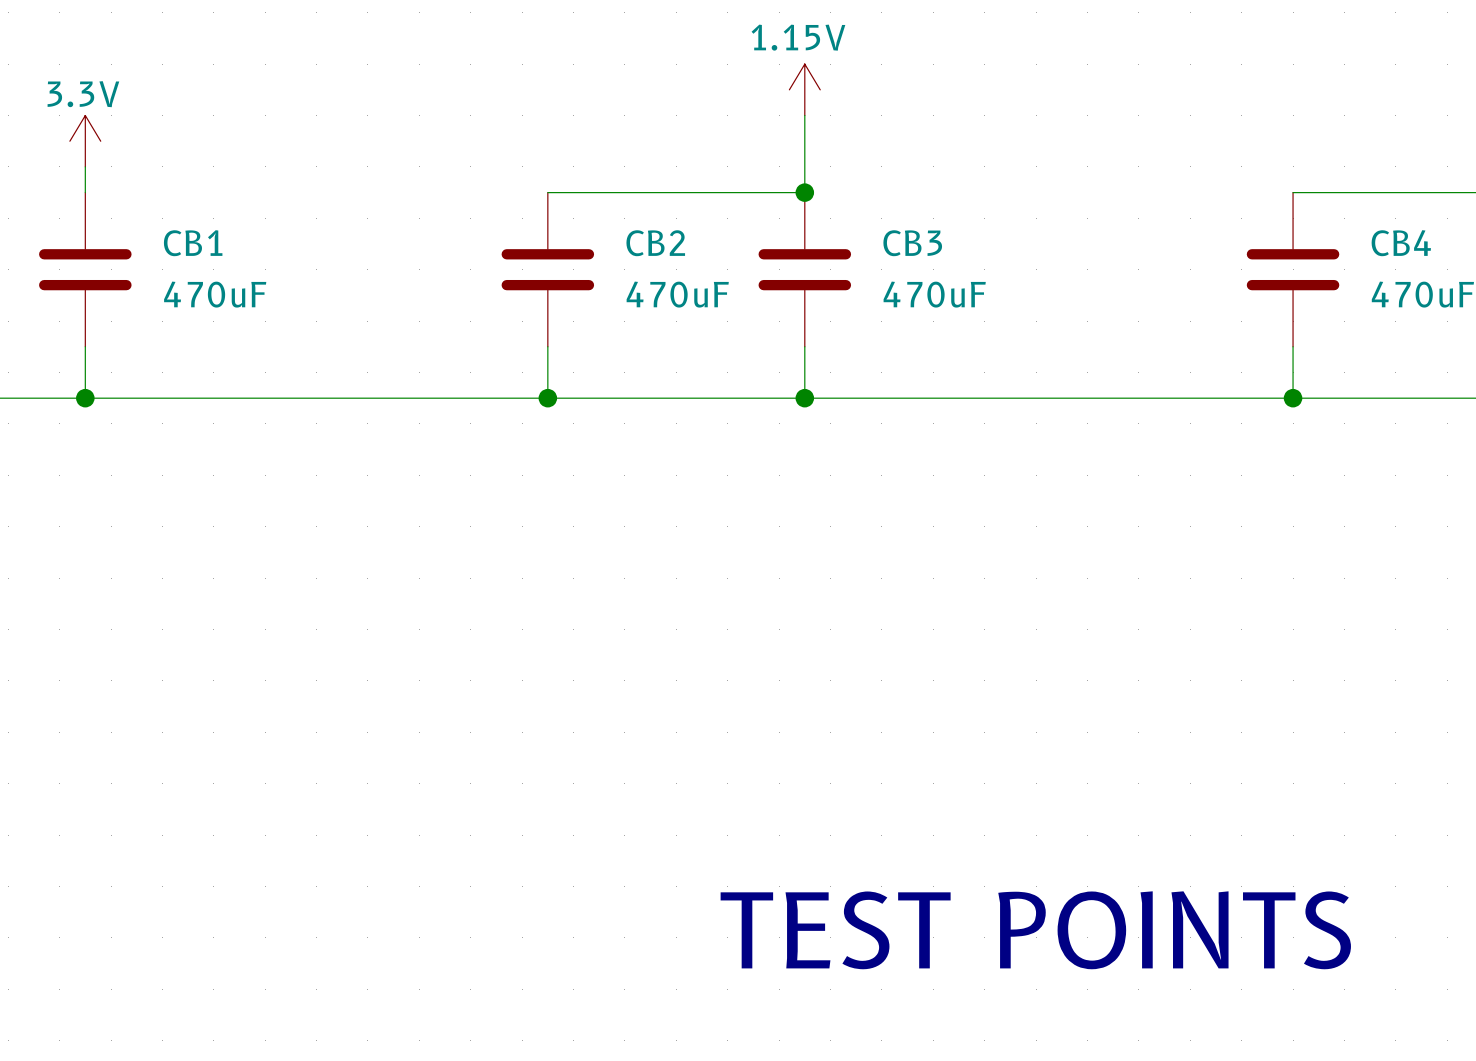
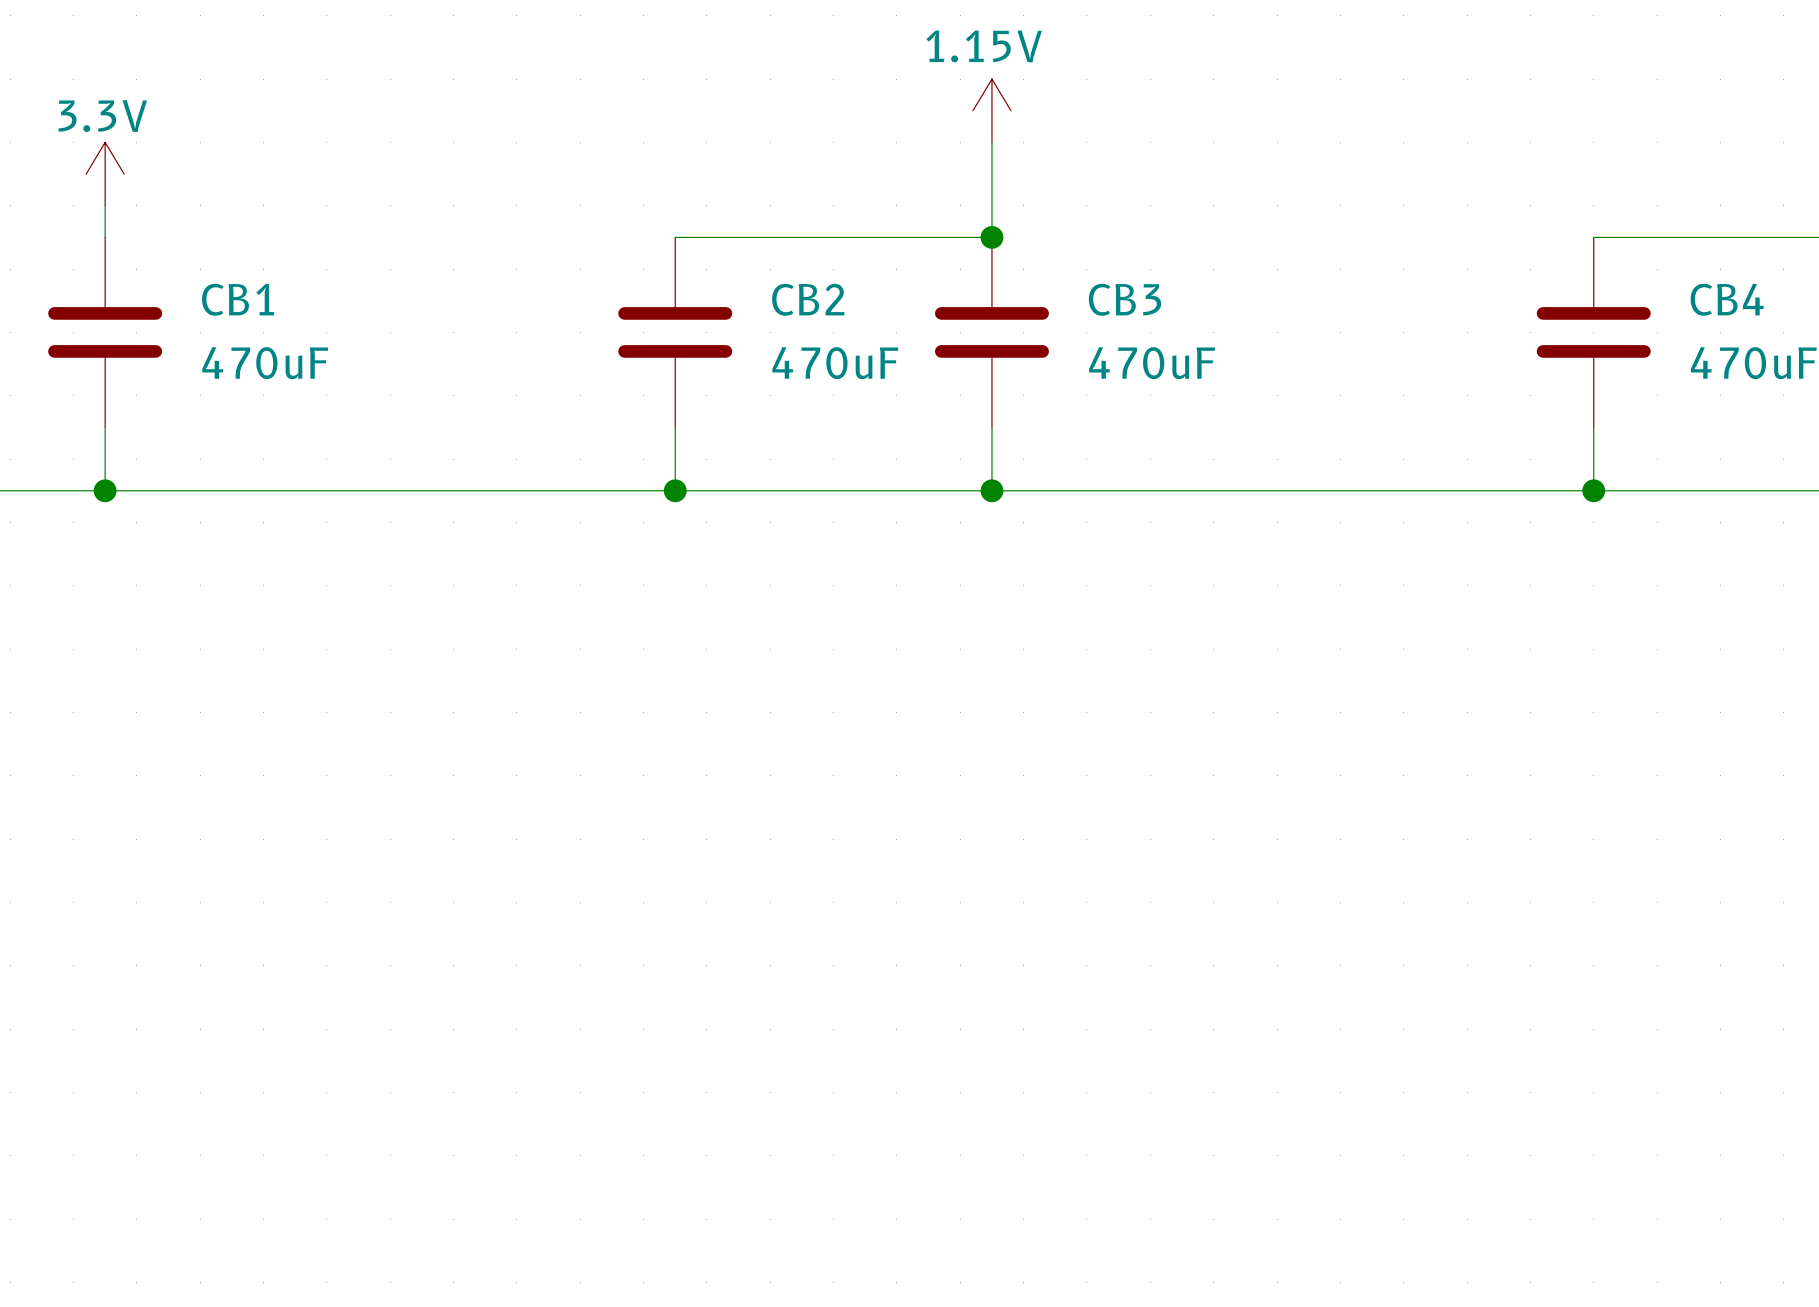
text: TEST POINTS (1035, 930) -> none

